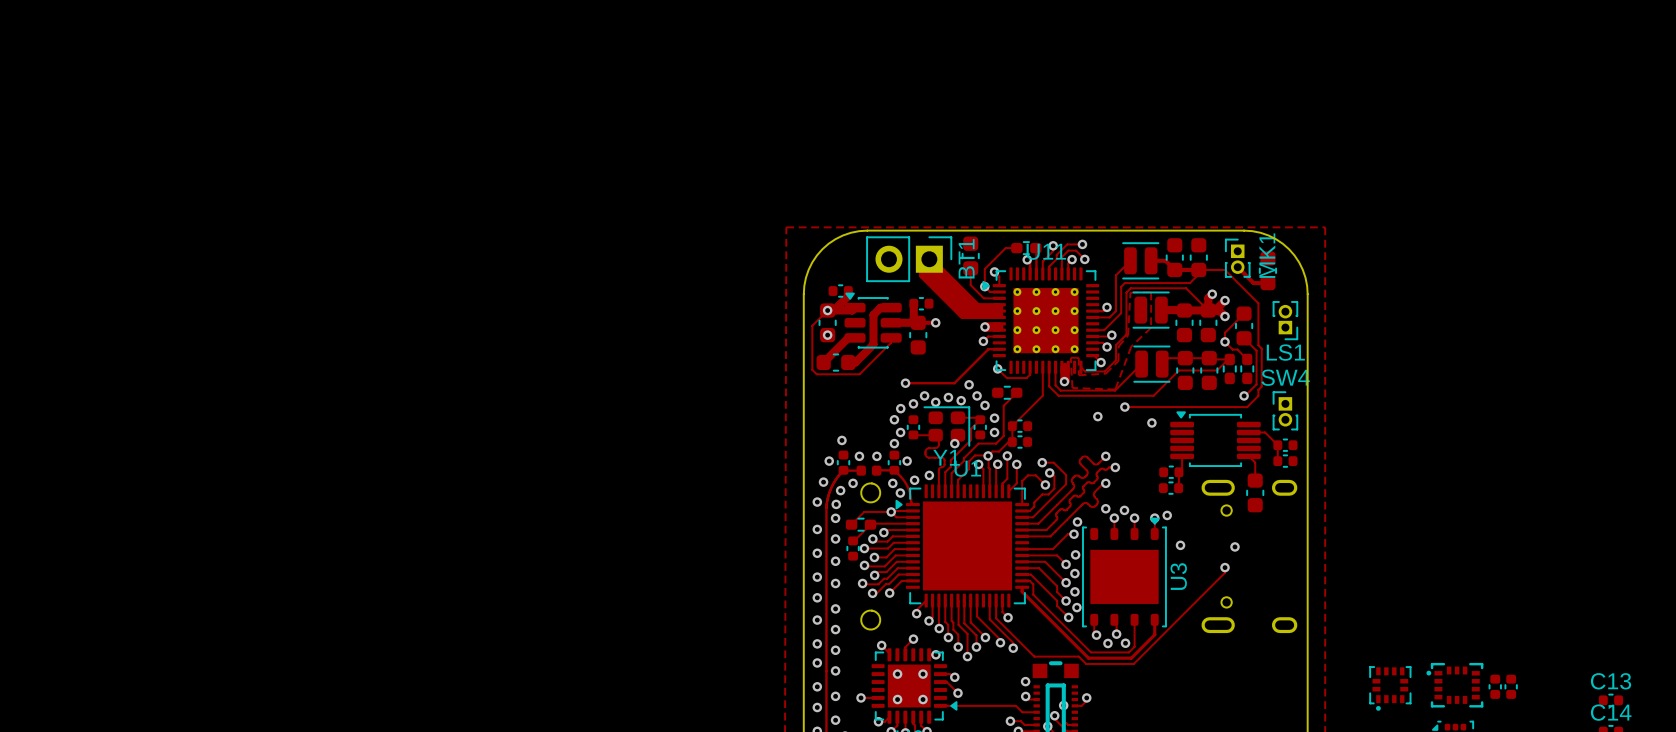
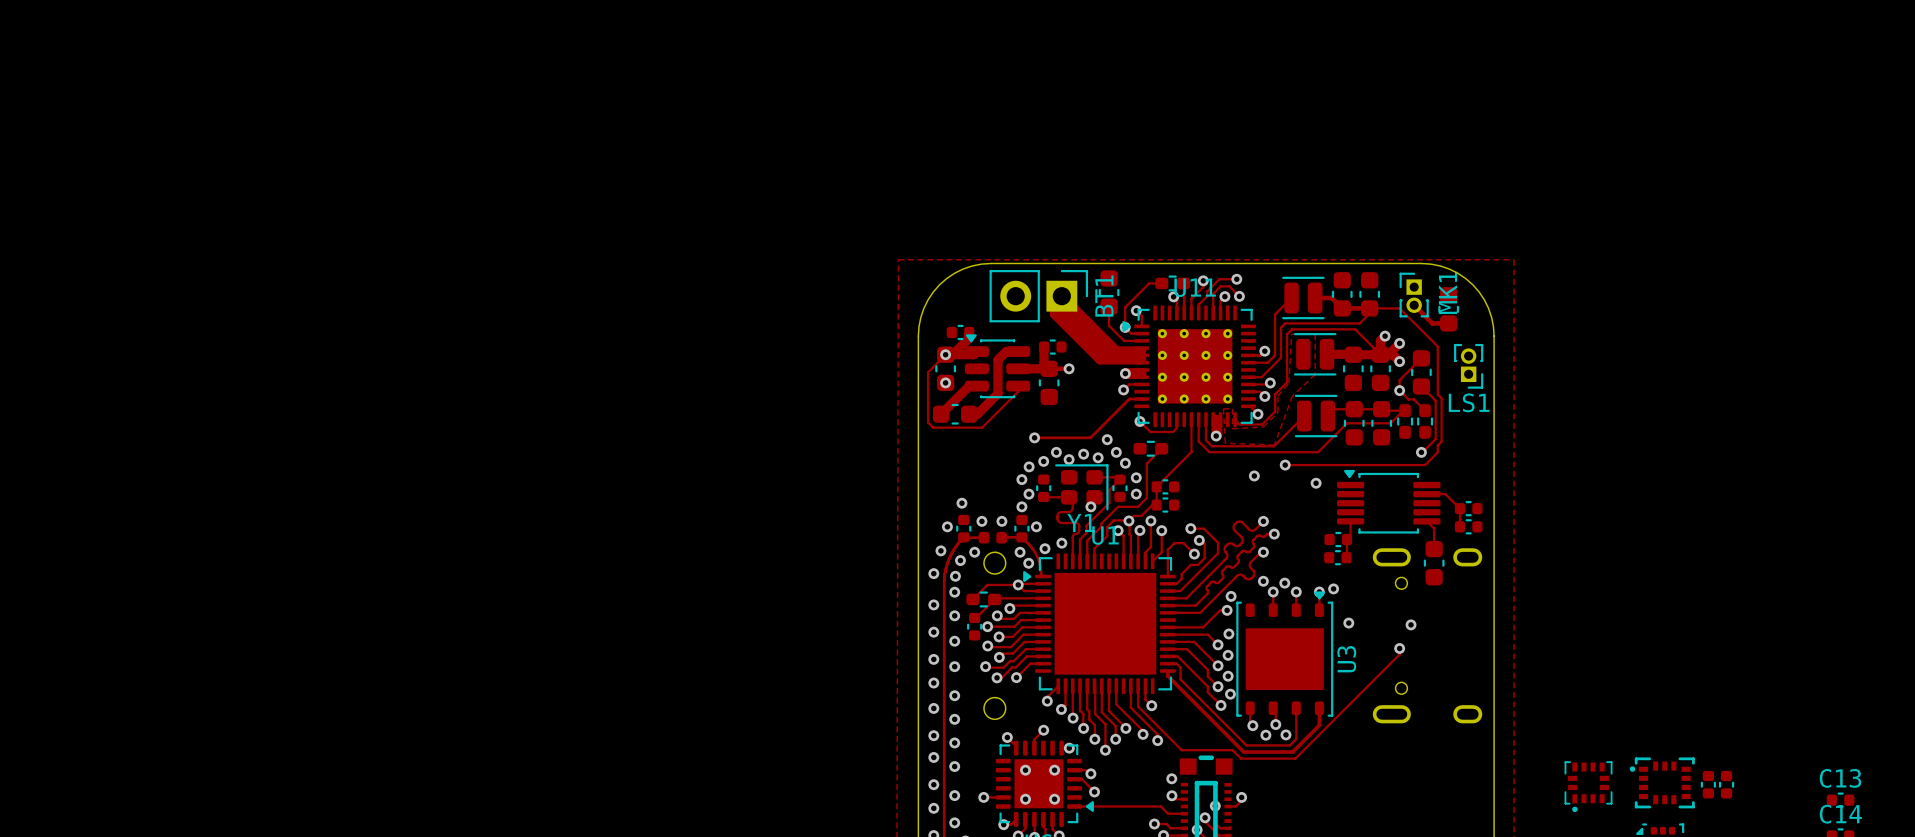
SW4: (1285, 410) -> none

